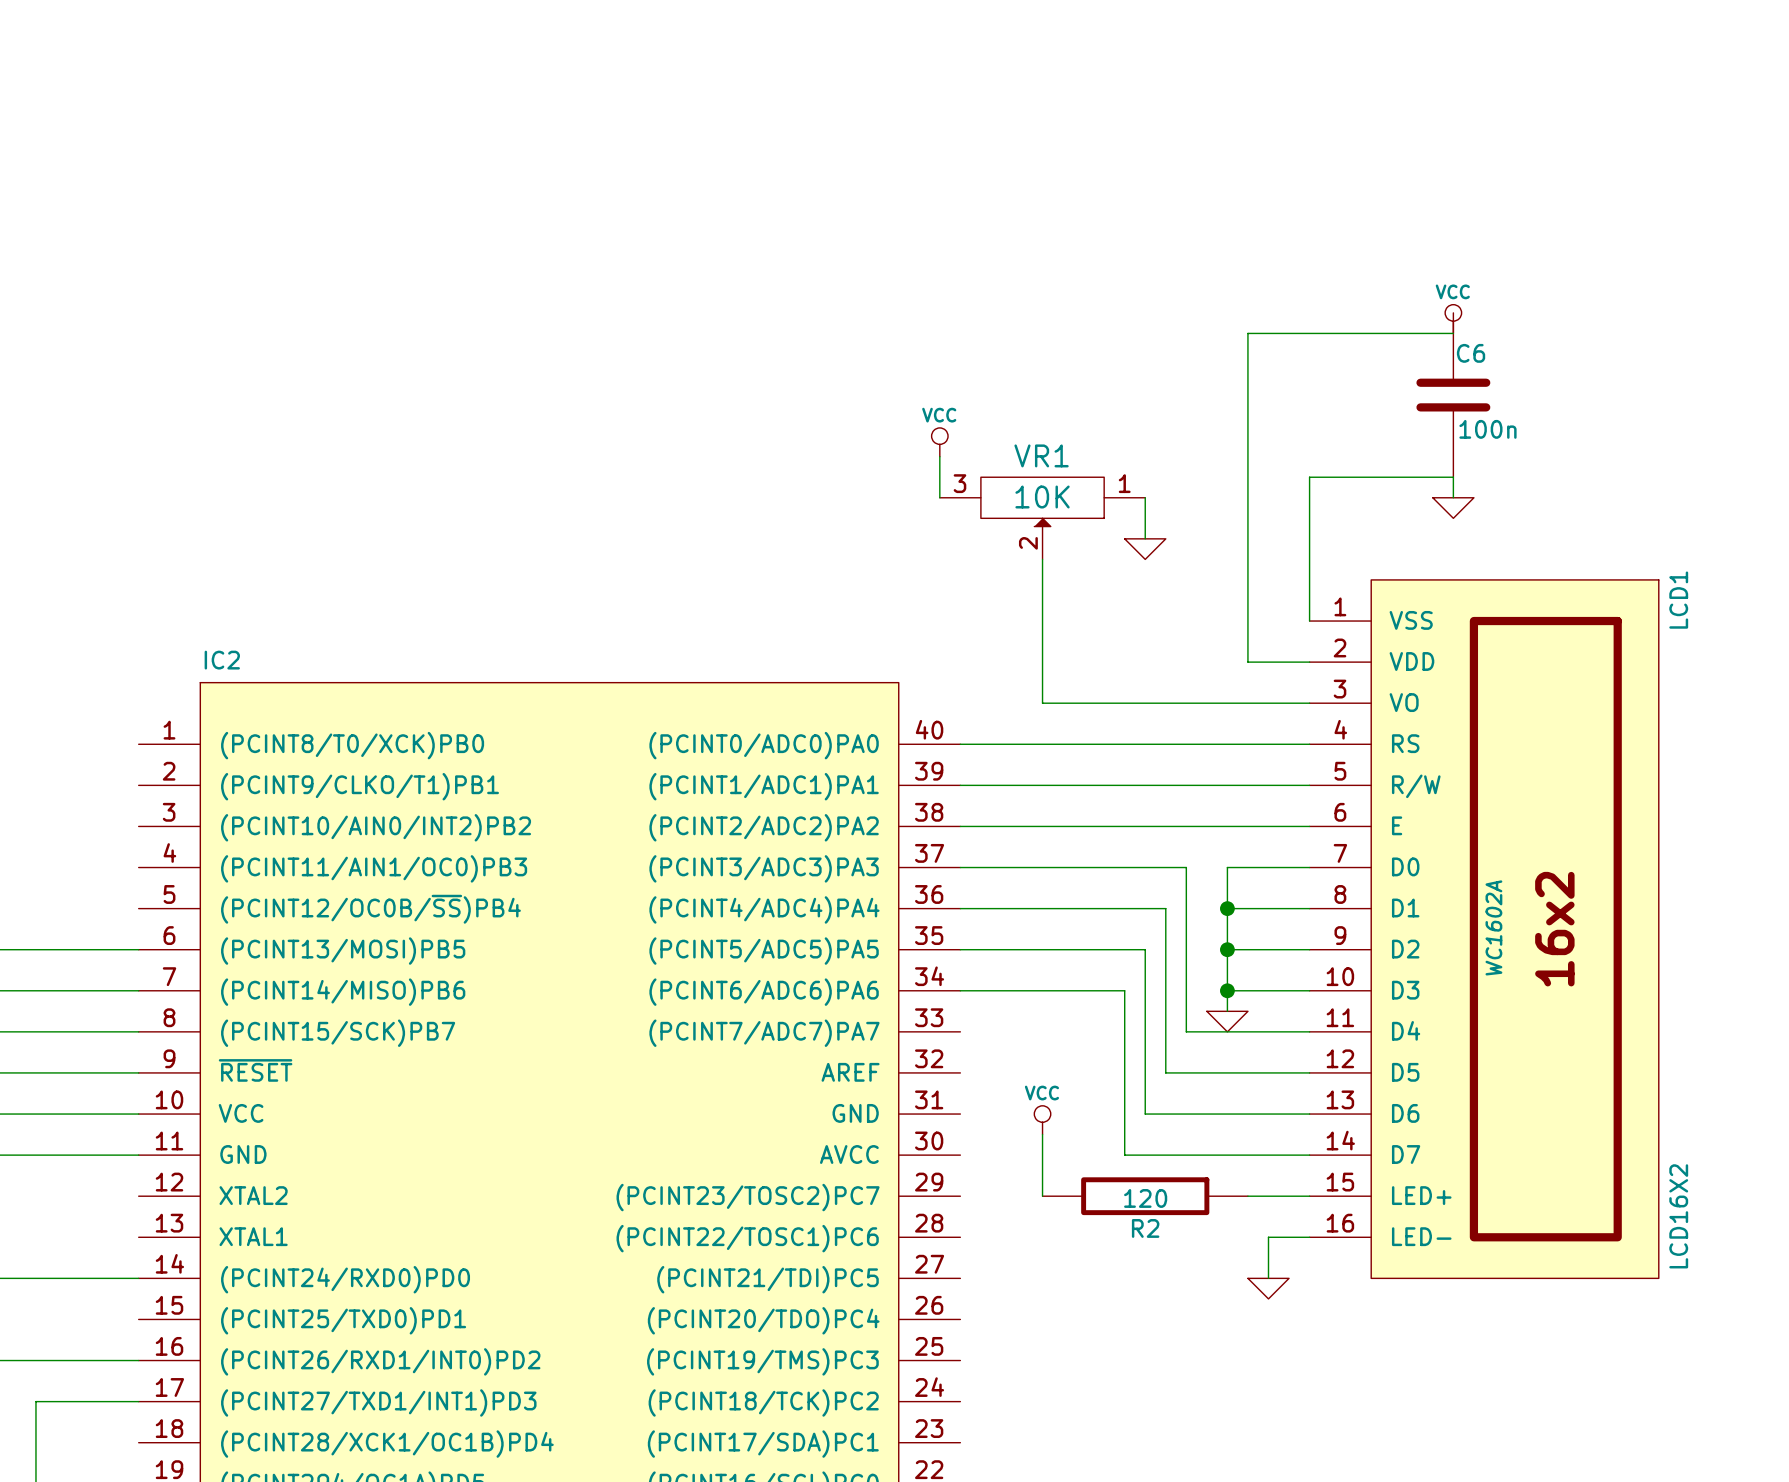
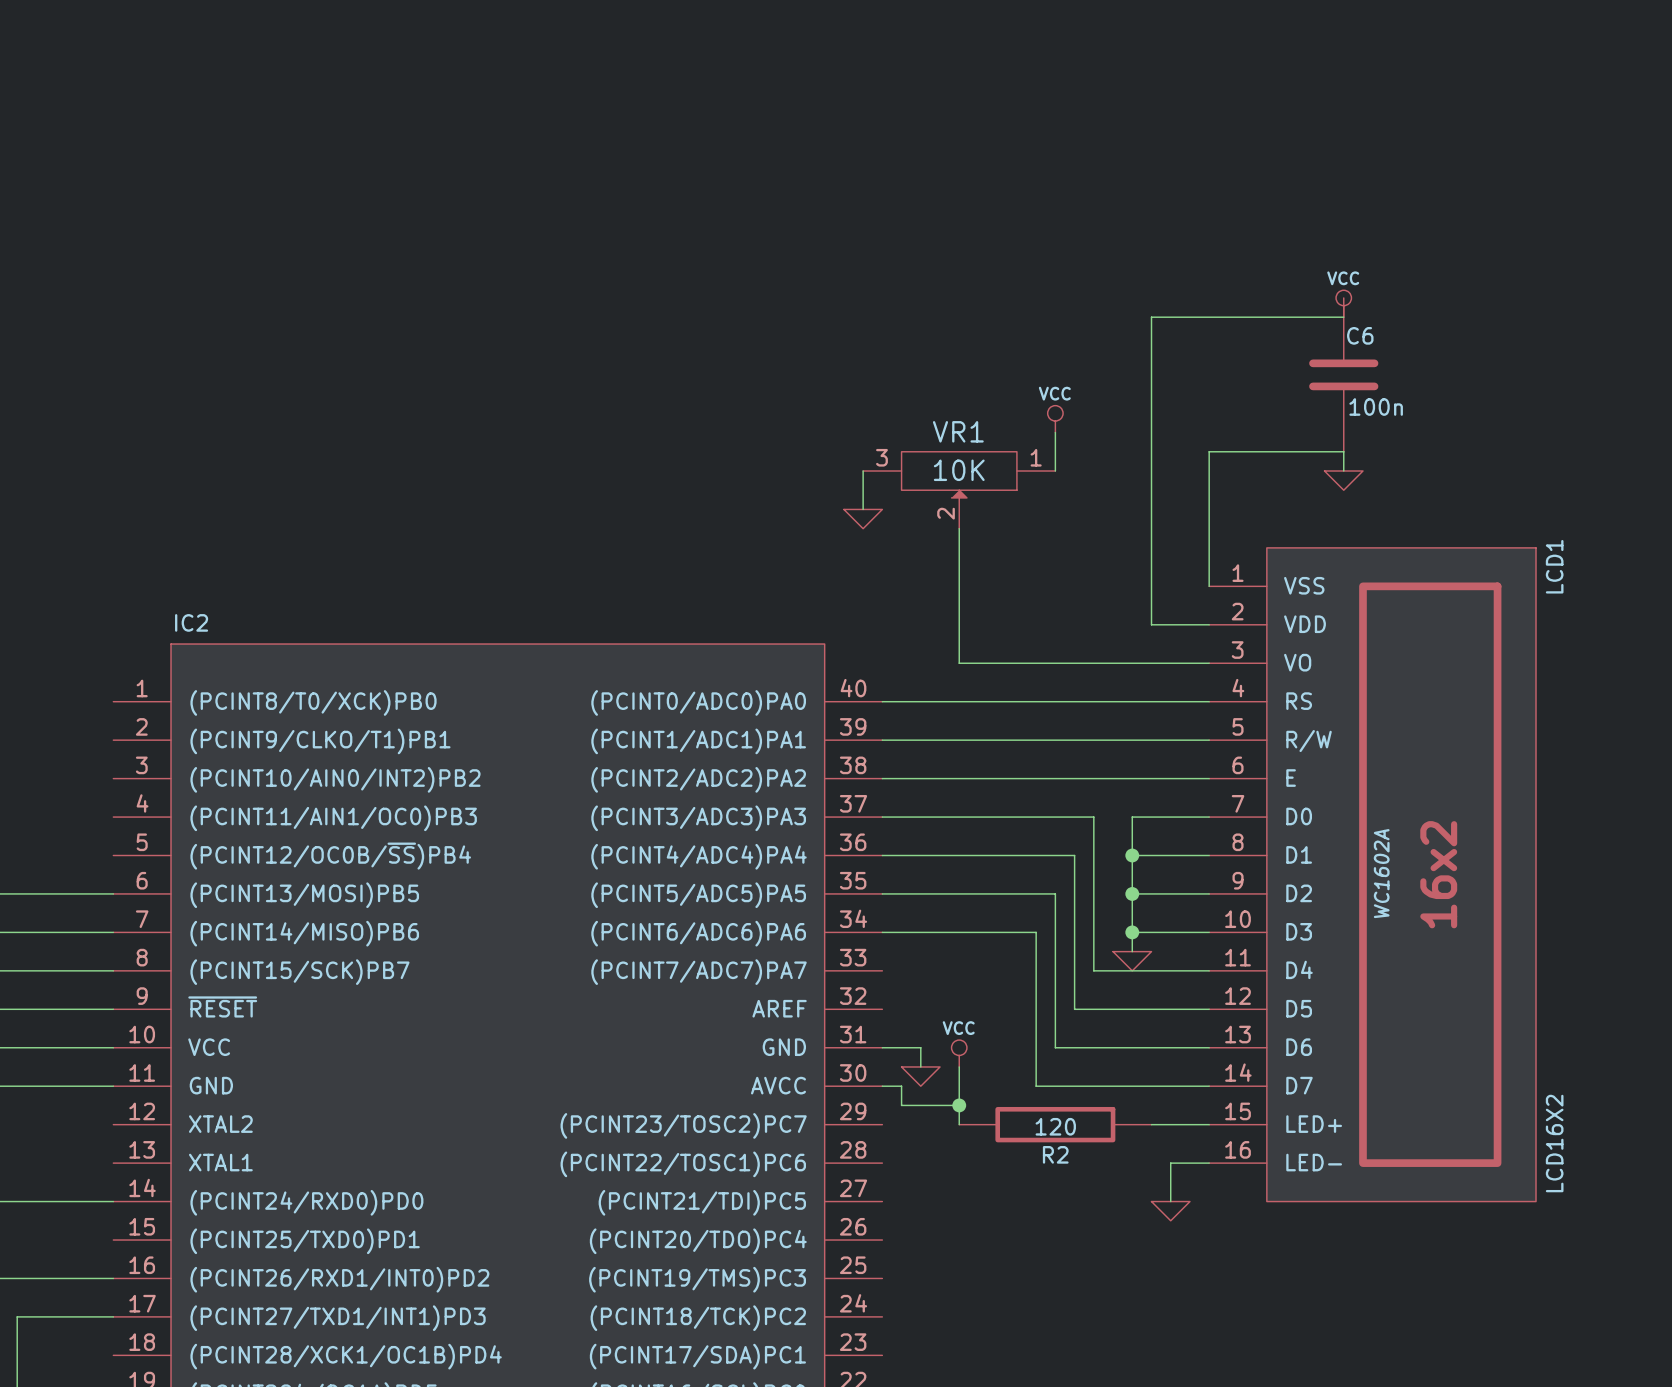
power symbol position: VCC (939, 442) -> VCC (1055, 419)
wire: (939, 456) (939, 497) -> (863, 509) (863, 471)
wire: (1145, 497) (1145, 538) -> (1055, 471) (1055, 432)
power symbol position: (1145, 549) -> (863, 519)
wire: none -> (882, 1047) (920, 1047) (920, 1066)
power symbol: none -> (920, 1076)
wire: none -> (882, 1086) (901, 1086) (901, 1105) (959, 1105)
junction: none -> (959, 1105)

